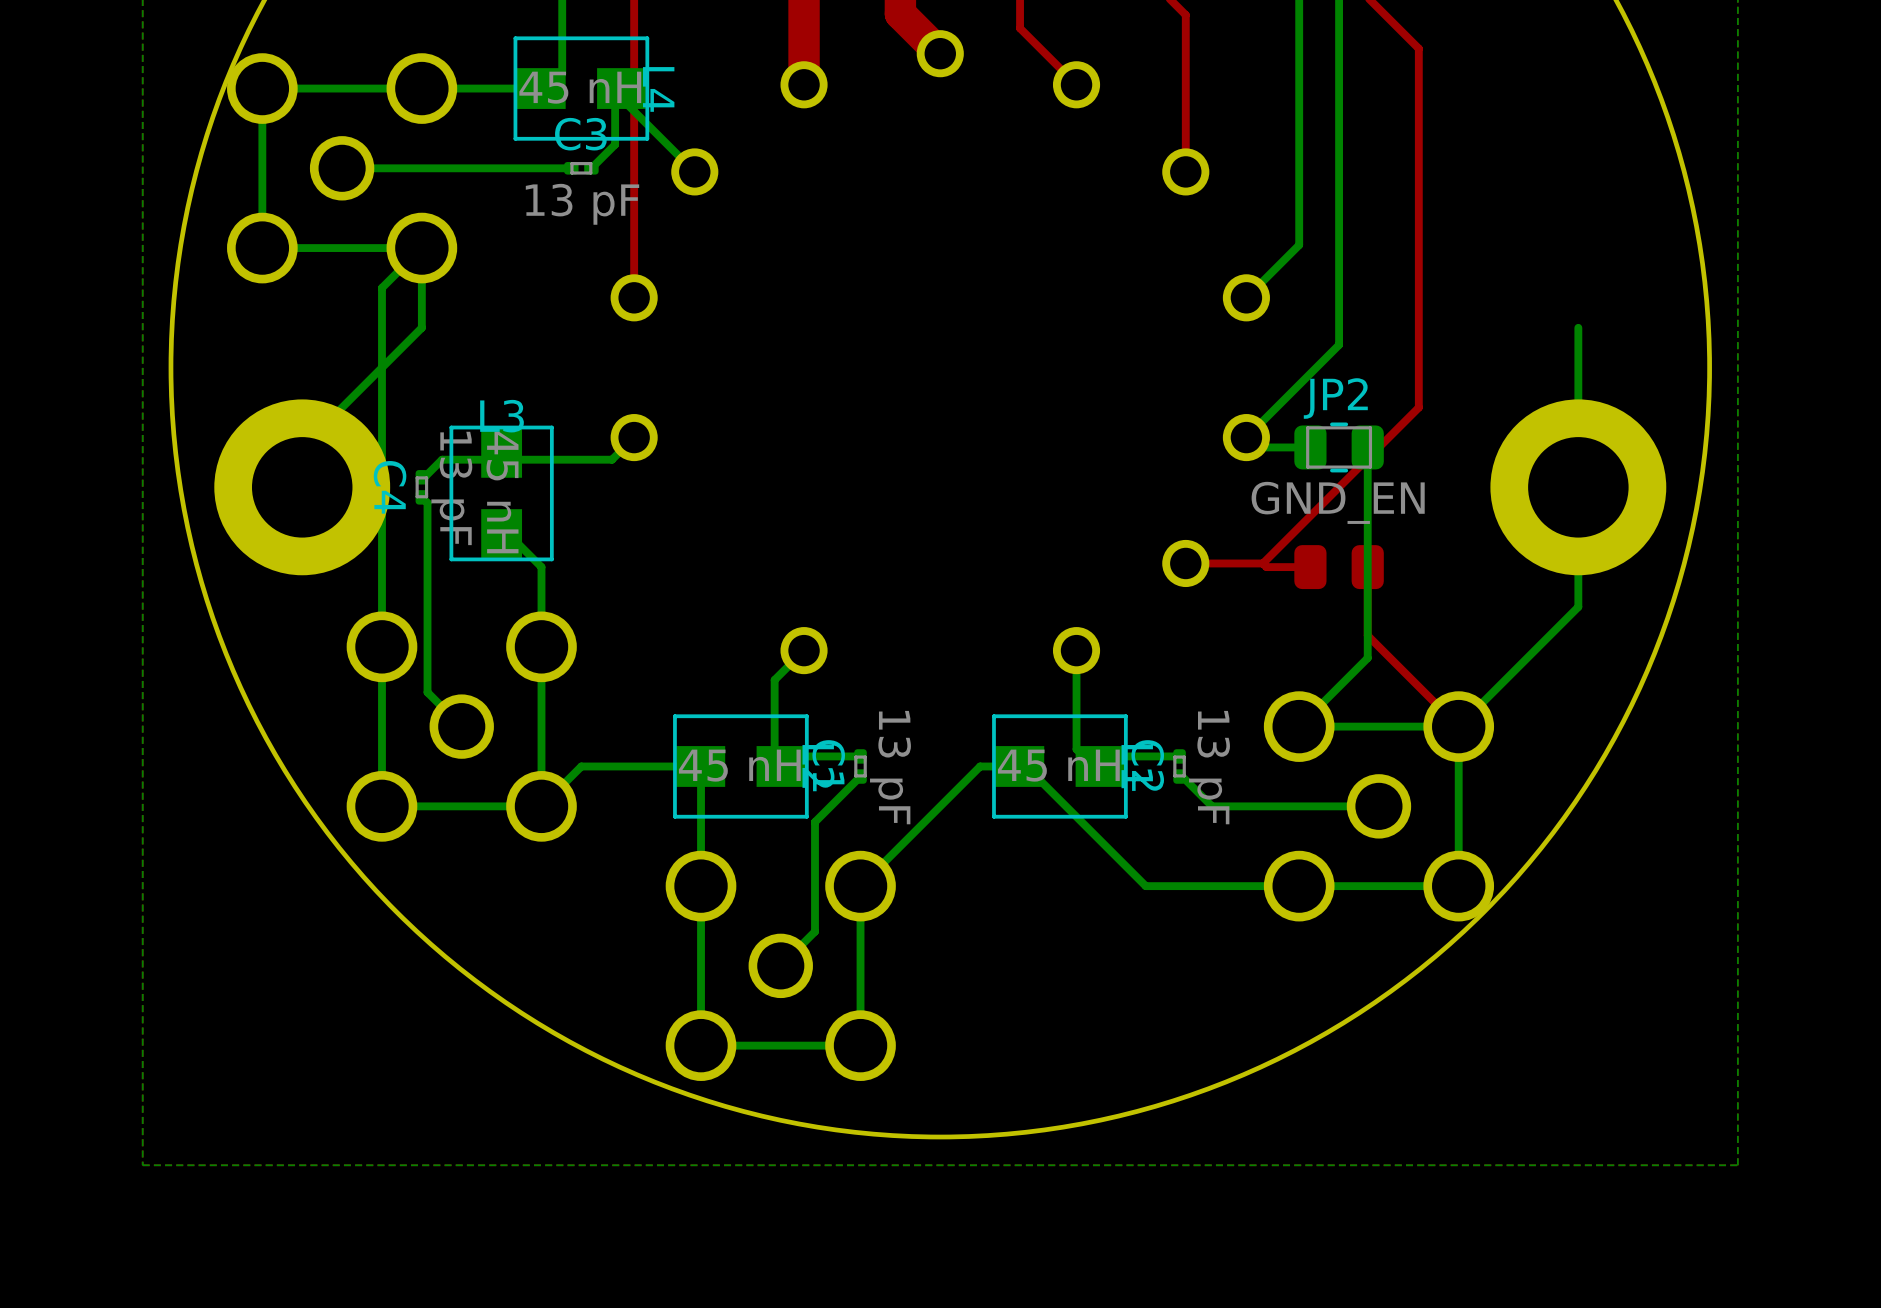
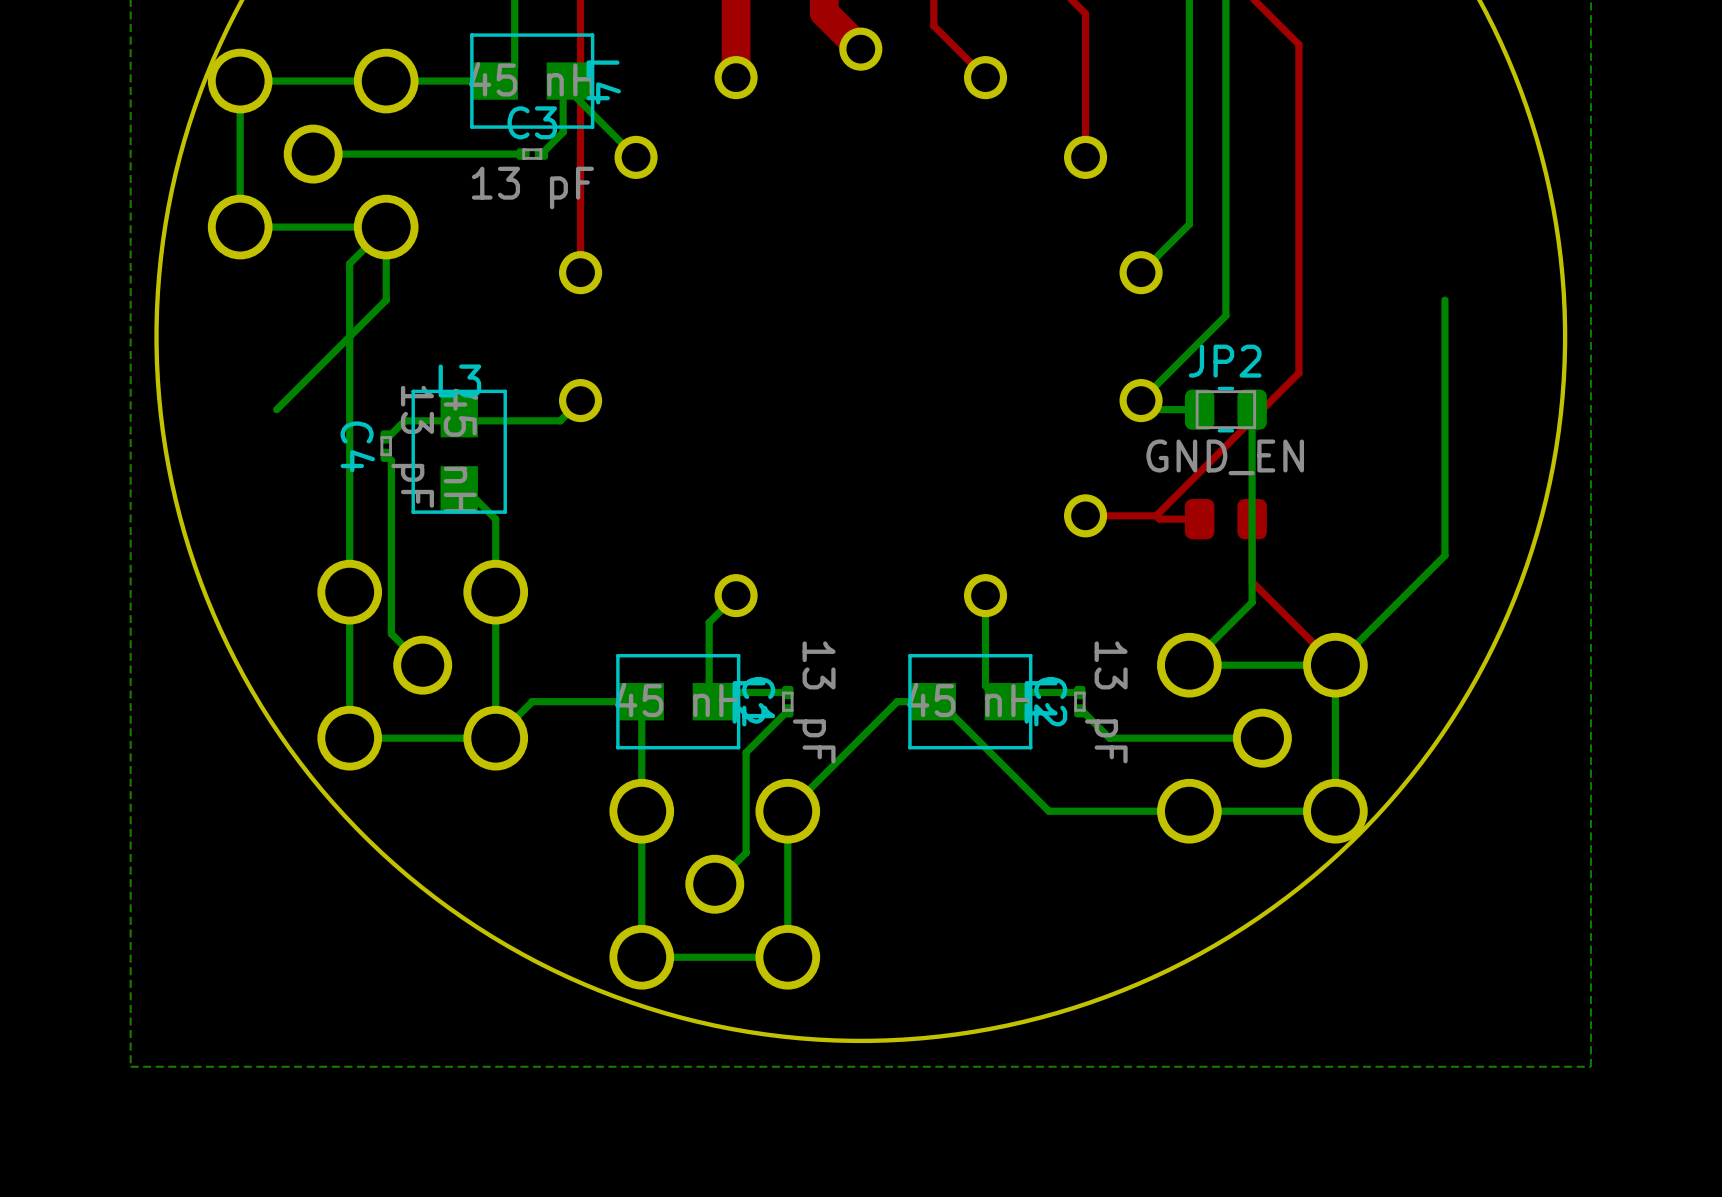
part: (302, 487) -> none
part: (1578, 487) -> none

